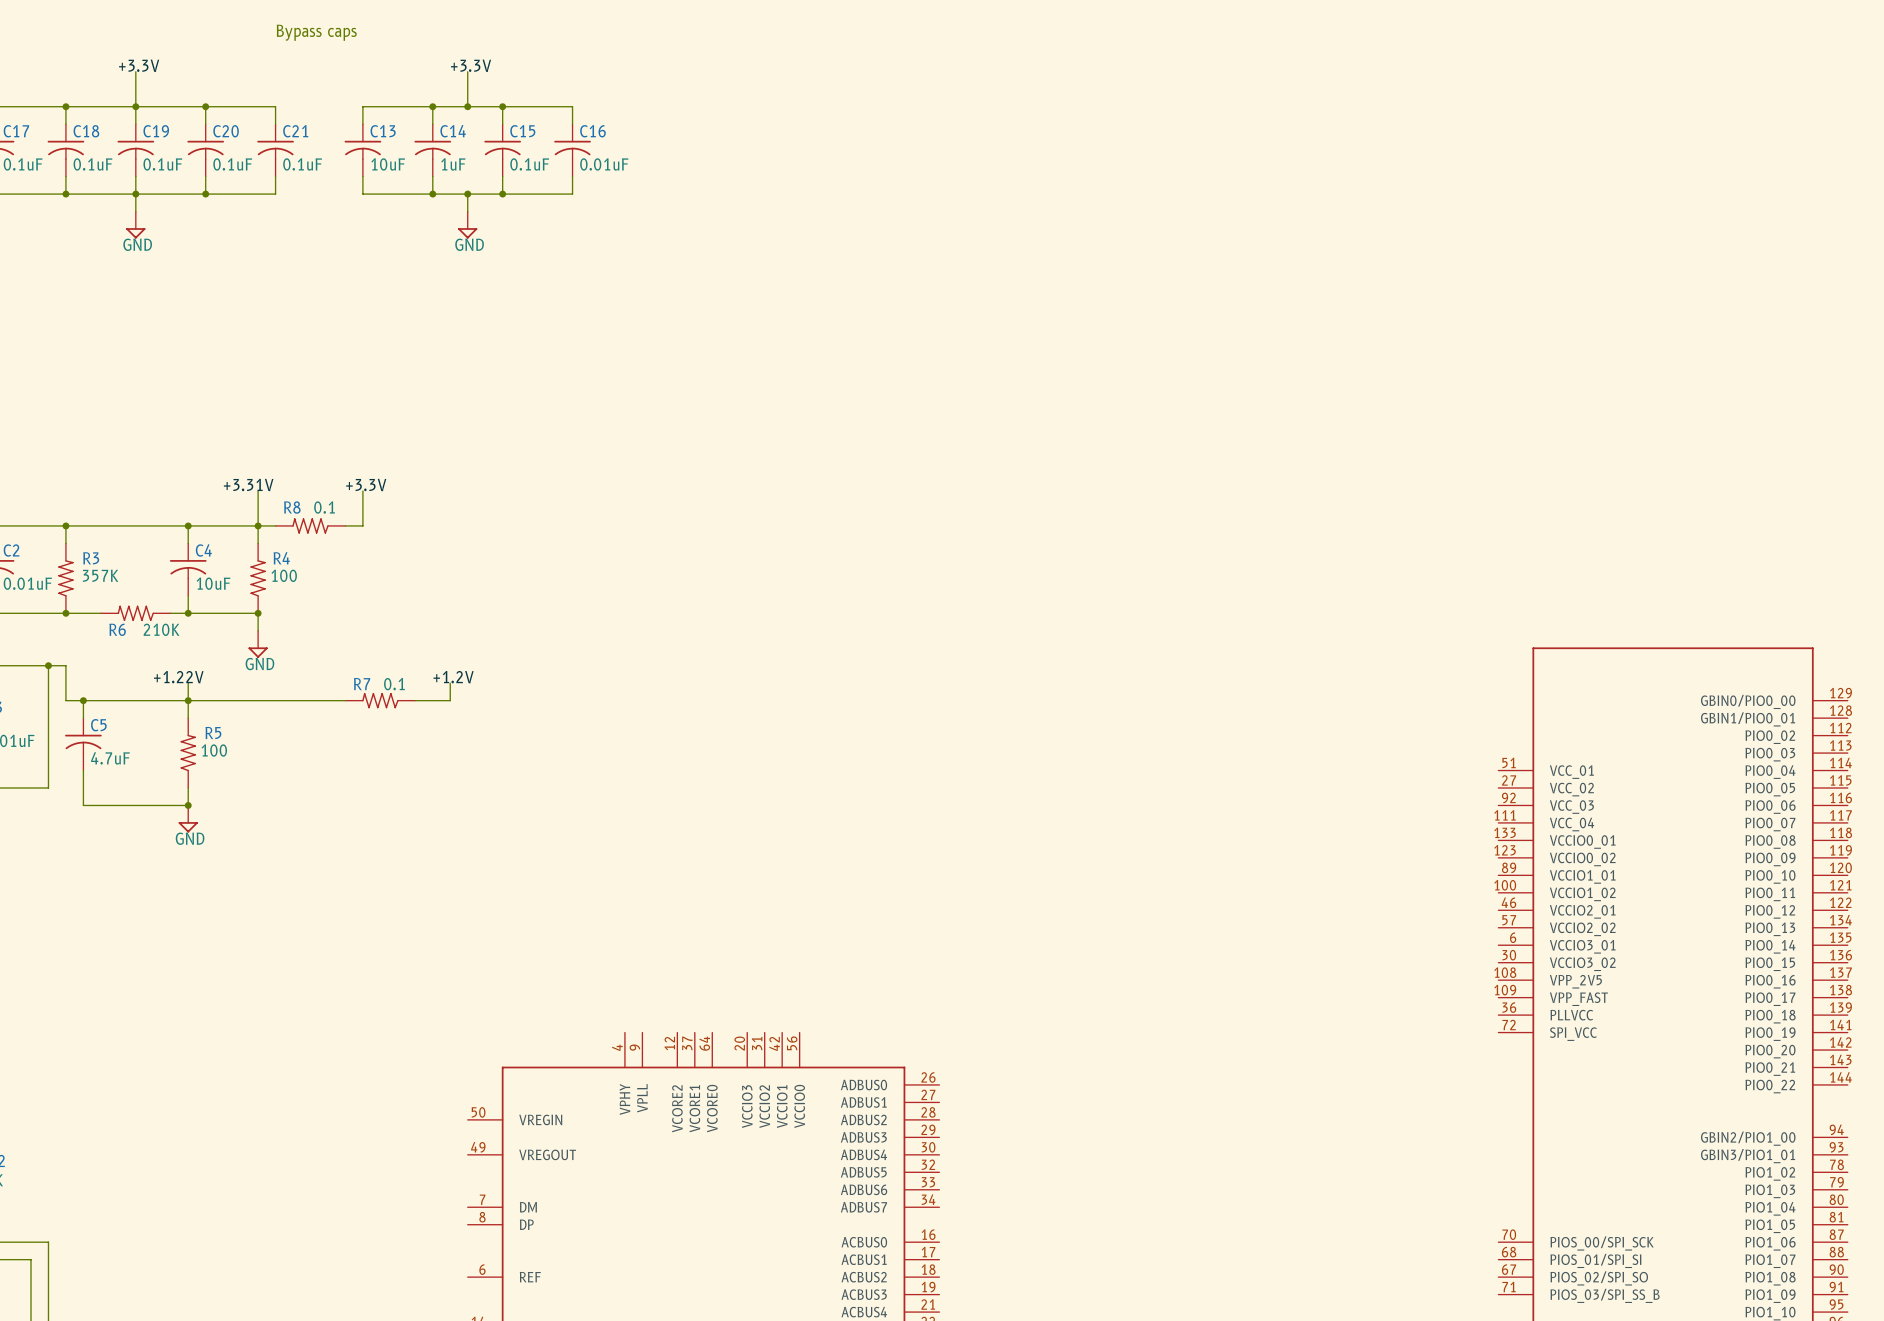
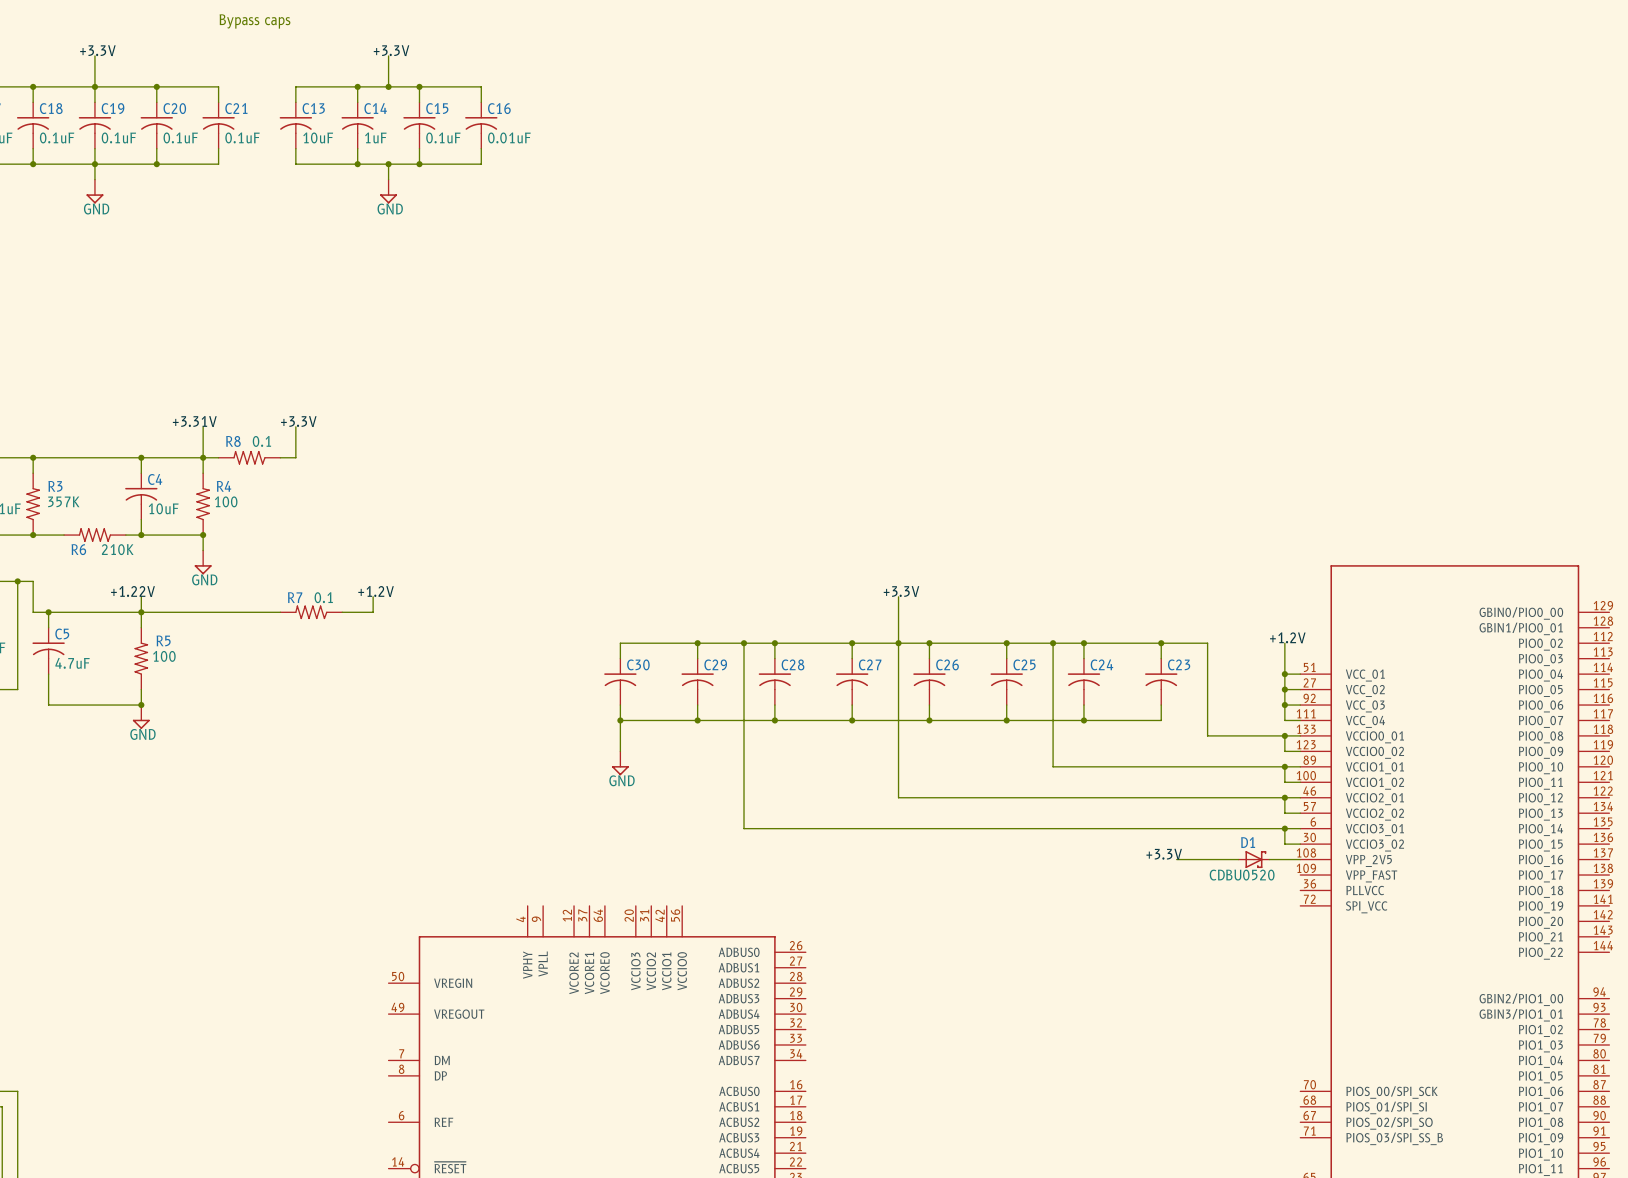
label: none -> +3.3V (901, 591)
wire: none -> (898, 596) (898, 797) (1300, 797)
label: none -> +1.2V (1287, 637)
wire: none -> (697, 643) (697, 658)
junction: none -> (697, 643)
wire: none -> (744, 643) (744, 828) (1300, 828)
junction: none -> (744, 643)
wire: none -> (774, 643) (774, 658)
junction: none -> (774, 643)
wire: none -> (852, 643) (852, 658)
junction: none -> (852, 643)
junction: none -> (898, 643)
wire: none -> (929, 643) (929, 658)
junction: none -> (929, 643)
wire: none -> (1006, 643) (1006, 658)
junction: none -> (1006, 643)
wire: none -> (1053, 643) (1053, 766) (1300, 766)
junction: none -> (1053, 643)
wire: none -> (1083, 643) (1083, 658)
junction: none -> (1083, 643)
wire: none -> (1161, 643) (1161, 658)
junction: none -> (1161, 643)
wire: none -> (1284, 643) (1284, 720) (1300, 720)
wire: none -> (620, 658) (620, 643) (1207, 643) (1207, 735) (1300, 735)
wire: none -> (1284, 674) (1300, 674)
junction: none -> (1284, 674)
C30: none -> (620, 681)
C29: none -> (697, 681)
C28: none -> (774, 681)
C27: none -> (852, 681)
C26: none -> (929, 681)
C25: none -> (1006, 681)
C24: none -> (1083, 681)
C23: none -> (1161, 681)
wire: none -> (1284, 689) (1300, 689)
junction: none -> (1284, 689)
wire: none -> (620, 705) (620, 751)
wire: none -> (697, 705) (697, 720)
wire: none -> (774, 705) (774, 720)
wire: none -> (852, 705) (852, 720)
wire: none -> (929, 705) (929, 720)
wire: none -> (1006, 705) (1006, 720)
wire: none -> (1083, 705) (1083, 720)
wire: none -> (1161, 705) (1161, 720) (620, 720)
wire: none -> (1284, 705) (1300, 705)
junction: none -> (1284, 705)
junction: none -> (620, 720)
junction: none -> (697, 720)
junction: none -> (774, 720)
junction: none -> (852, 720)
junction: none -> (929, 720)
junction: none -> (1006, 720)
junction: none -> (1083, 720)
wire: none -> (1284, 735) (1284, 751) (1300, 751)
junction: none -> (1284, 735)
power symbol: none -> GND (620, 763)
wire: none -> (1284, 766) (1284, 782) (1300, 782)
junction: none -> (1284, 766)
wire: none -> (1284, 797) (1284, 813) (1300, 813)
junction: none -> (1284, 797)
wire: none -> (1284, 828) (1284, 844) (1300, 844)
junction: none -> (1284, 828)
label: none -> +3.3V (1164, 854)
wire: none -> (1176, 859) (1238, 859)
D1: none -> CDBU0520 (1253, 859)
wire: none -> (1269, 859) (1300, 859)

